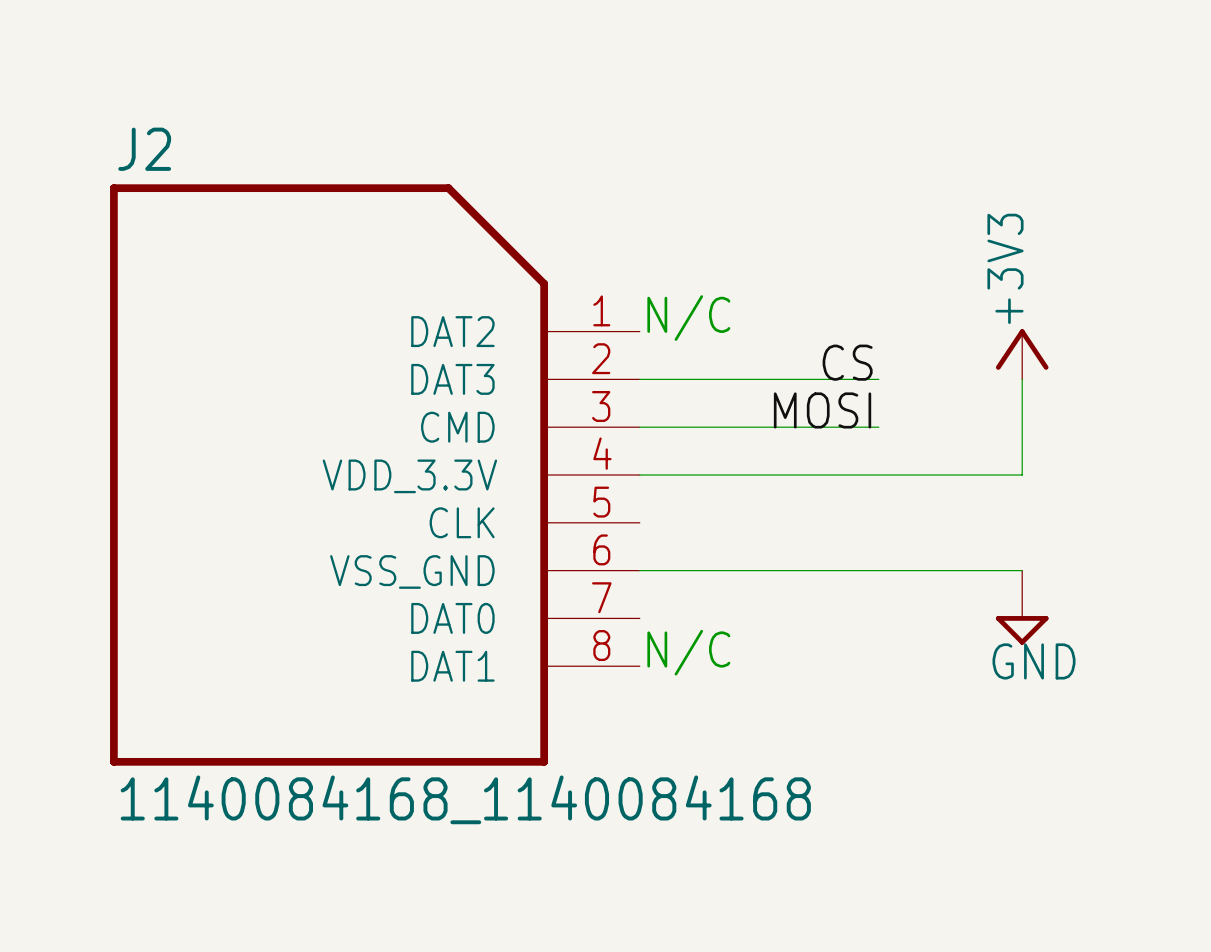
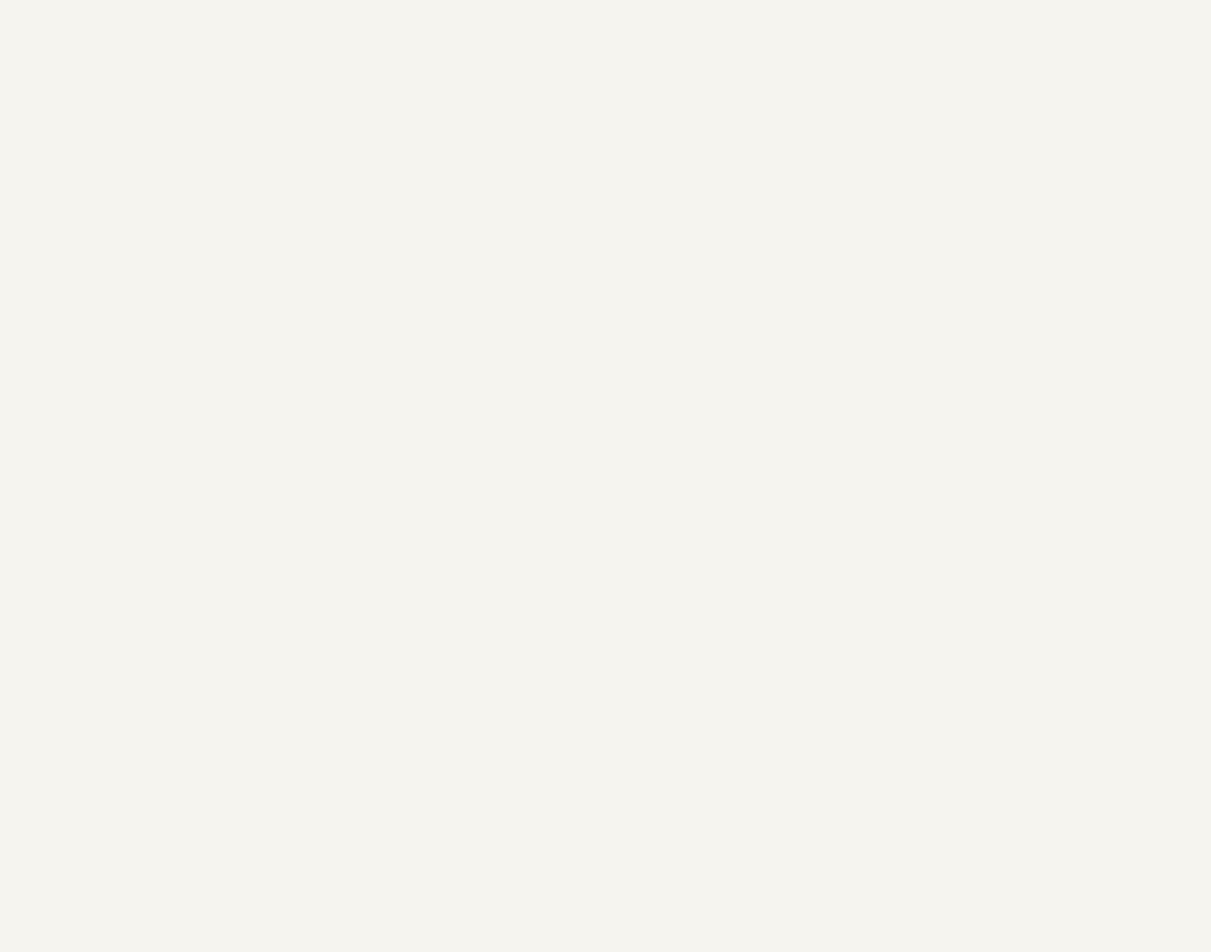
text: N/C (688, 318) -> none
power symbol: +3V3 (1022, 354) -> none
label: CS (847, 362) -> none
wire: (639, 379) (878, 379) -> none
wire: (1022, 379) (1022, 475) (639, 475) -> none
label: MOSI (822, 410) -> none
wire: (639, 427) (878, 427) -> none
J2: 1140084168_1140084168 (374, 475) -> none
wire: (639, 570) (1022, 570) -> none
power symbol: GND (1022, 607) -> none
text: N/C (688, 652) -> none

